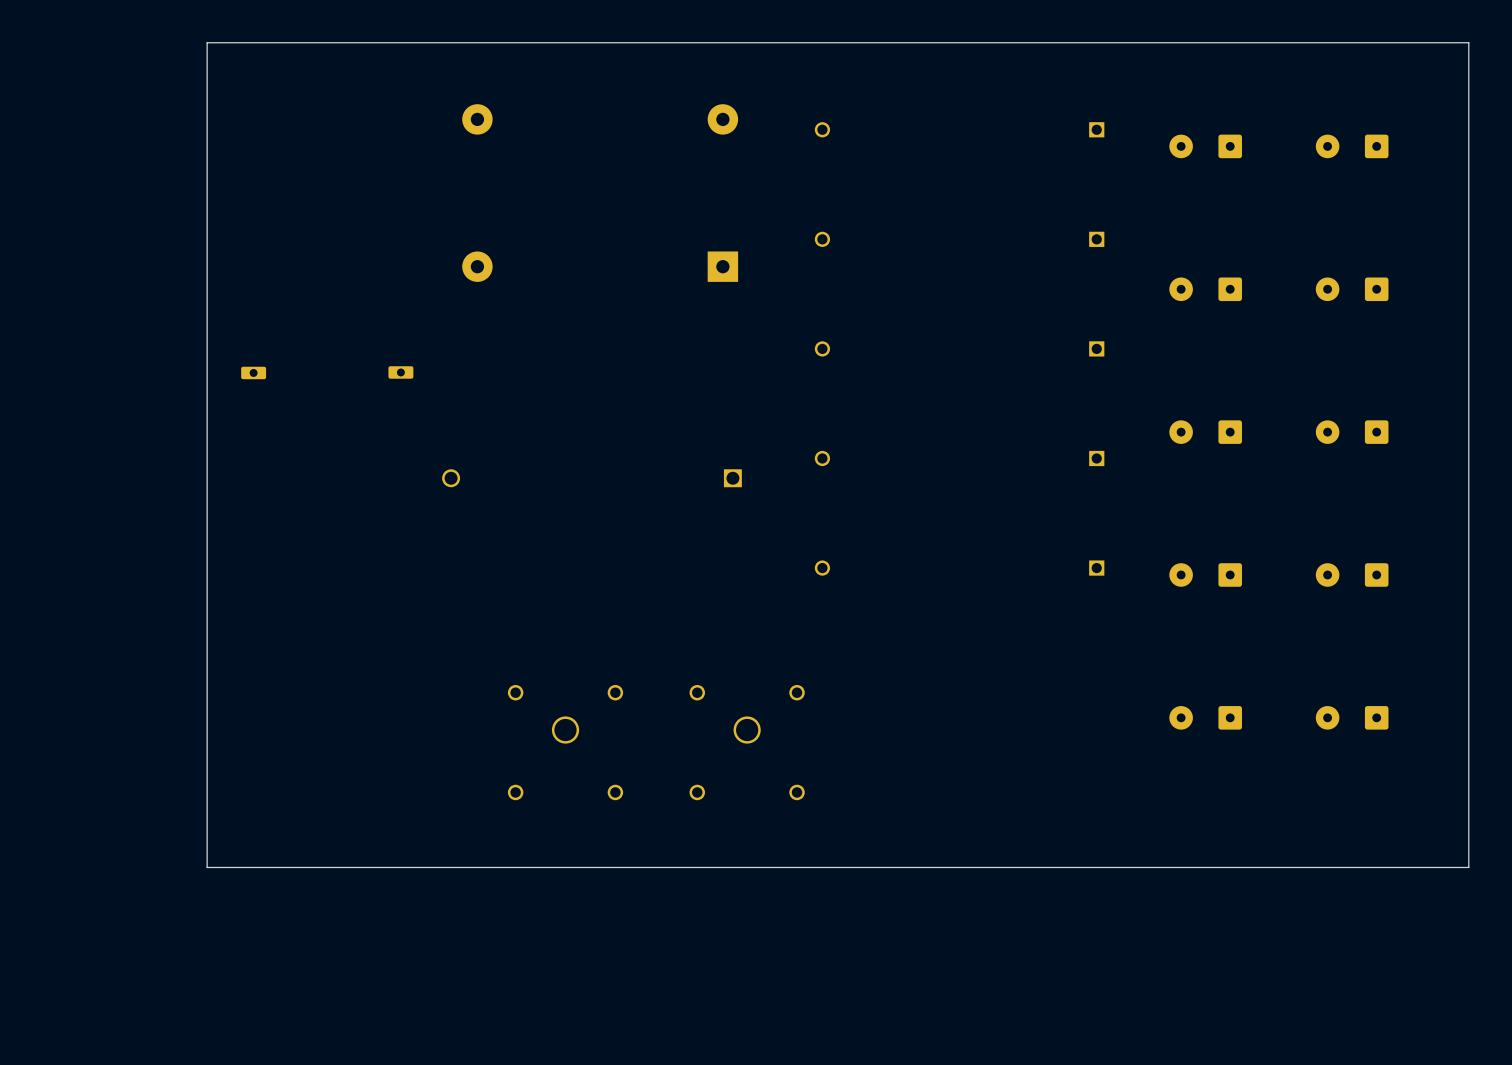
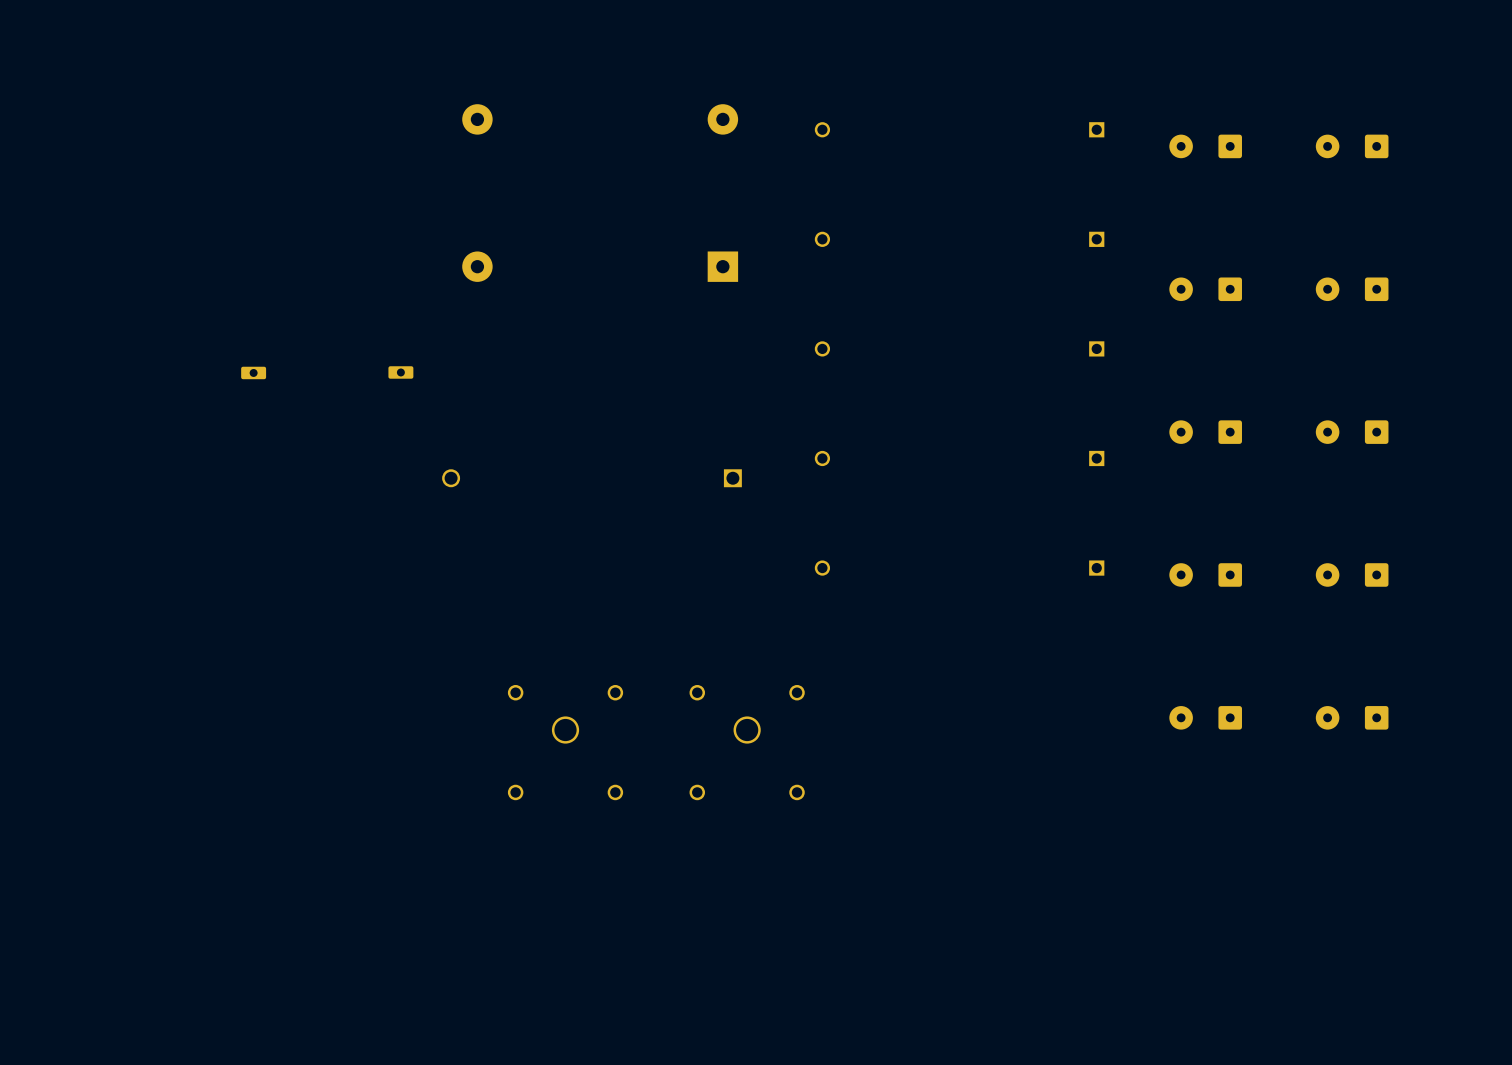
board edge: (1468, 42) (207, 42) (207, 867) (1468, 867) (1468, 42) -> none

